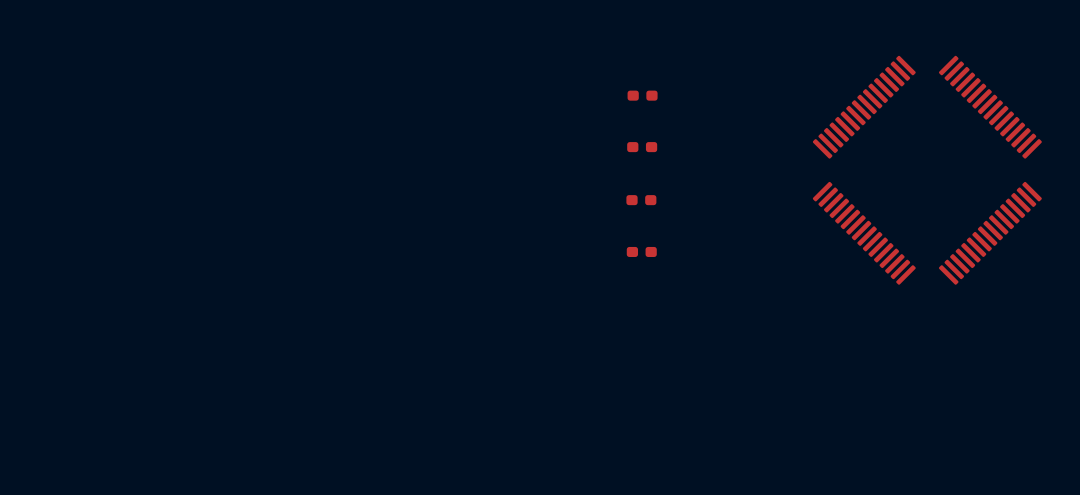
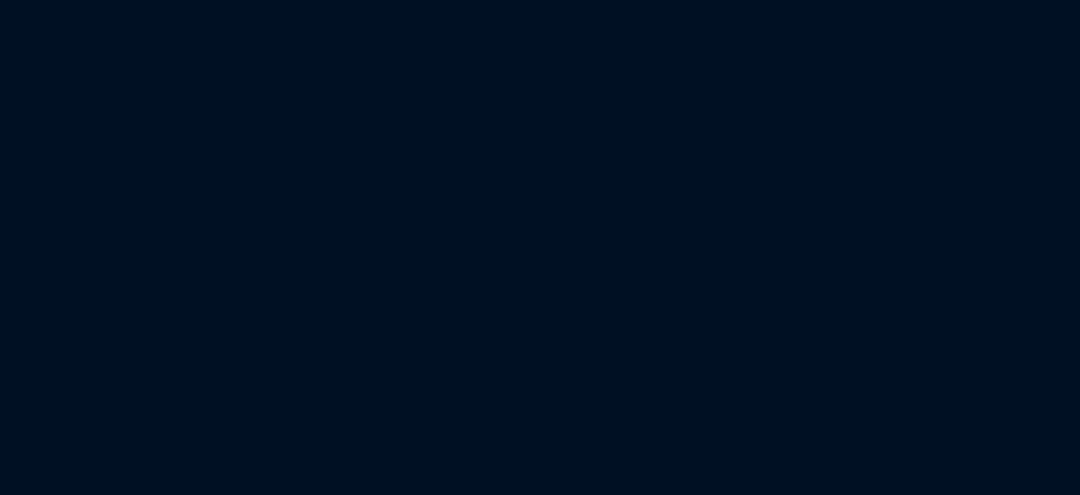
part: (642, 95) -> none
part: (642, 147) -> none
part: (927, 170) -> none
part: (641, 200) -> none
part: (641, 251) -> none

